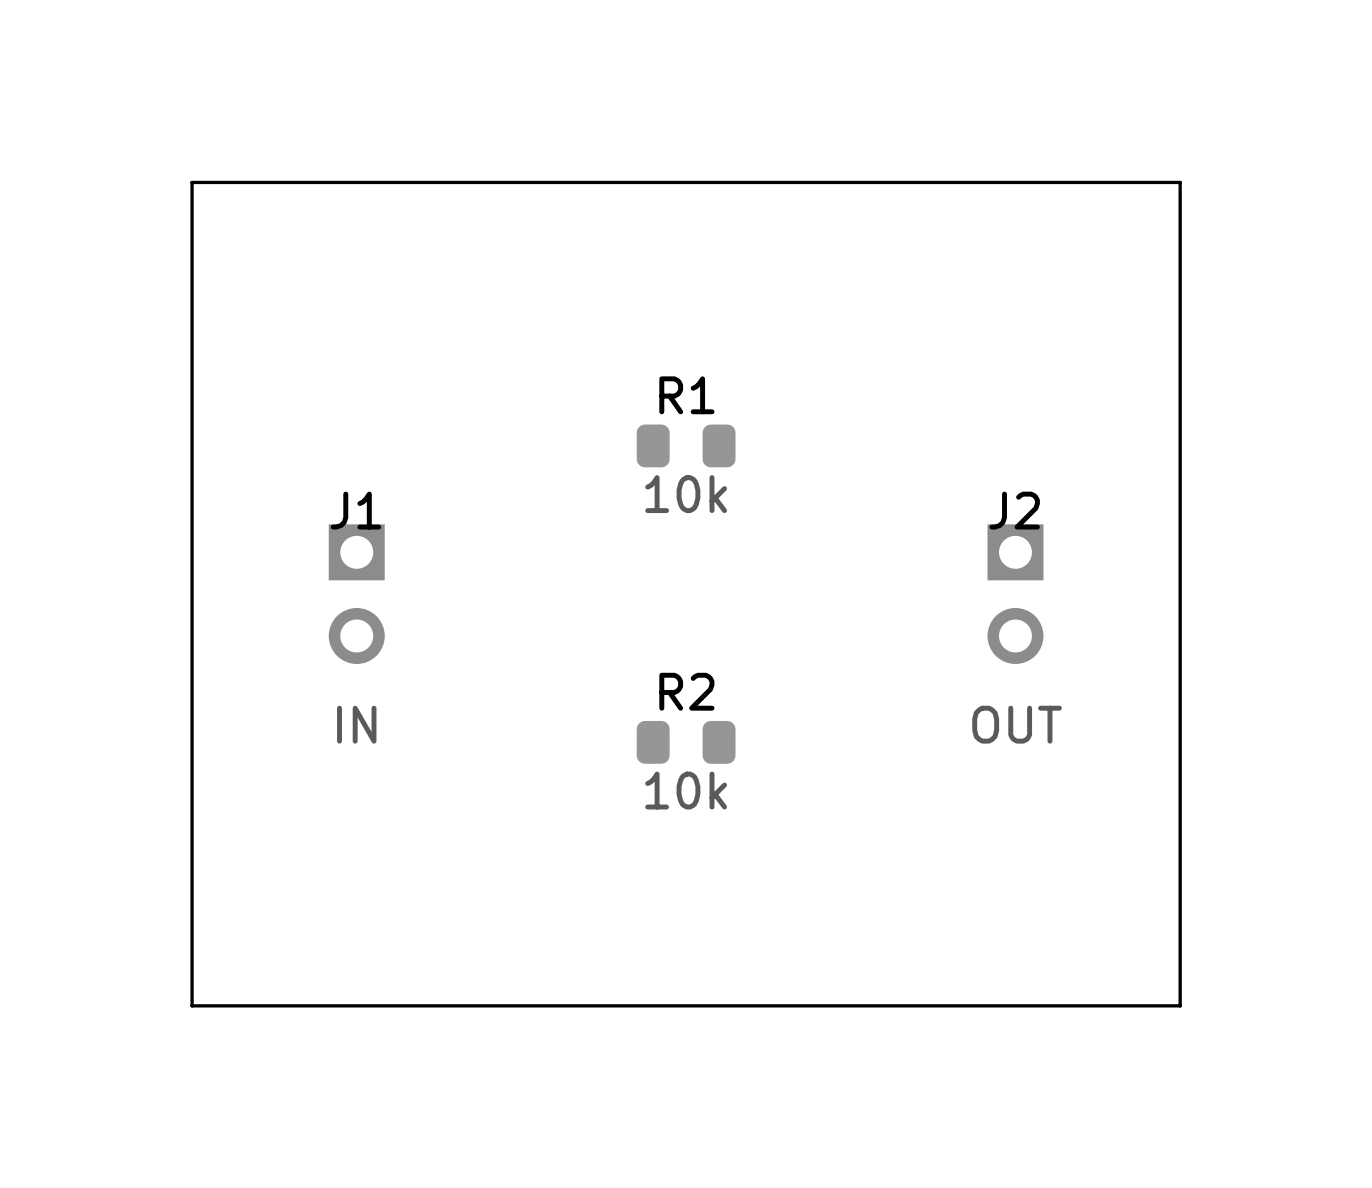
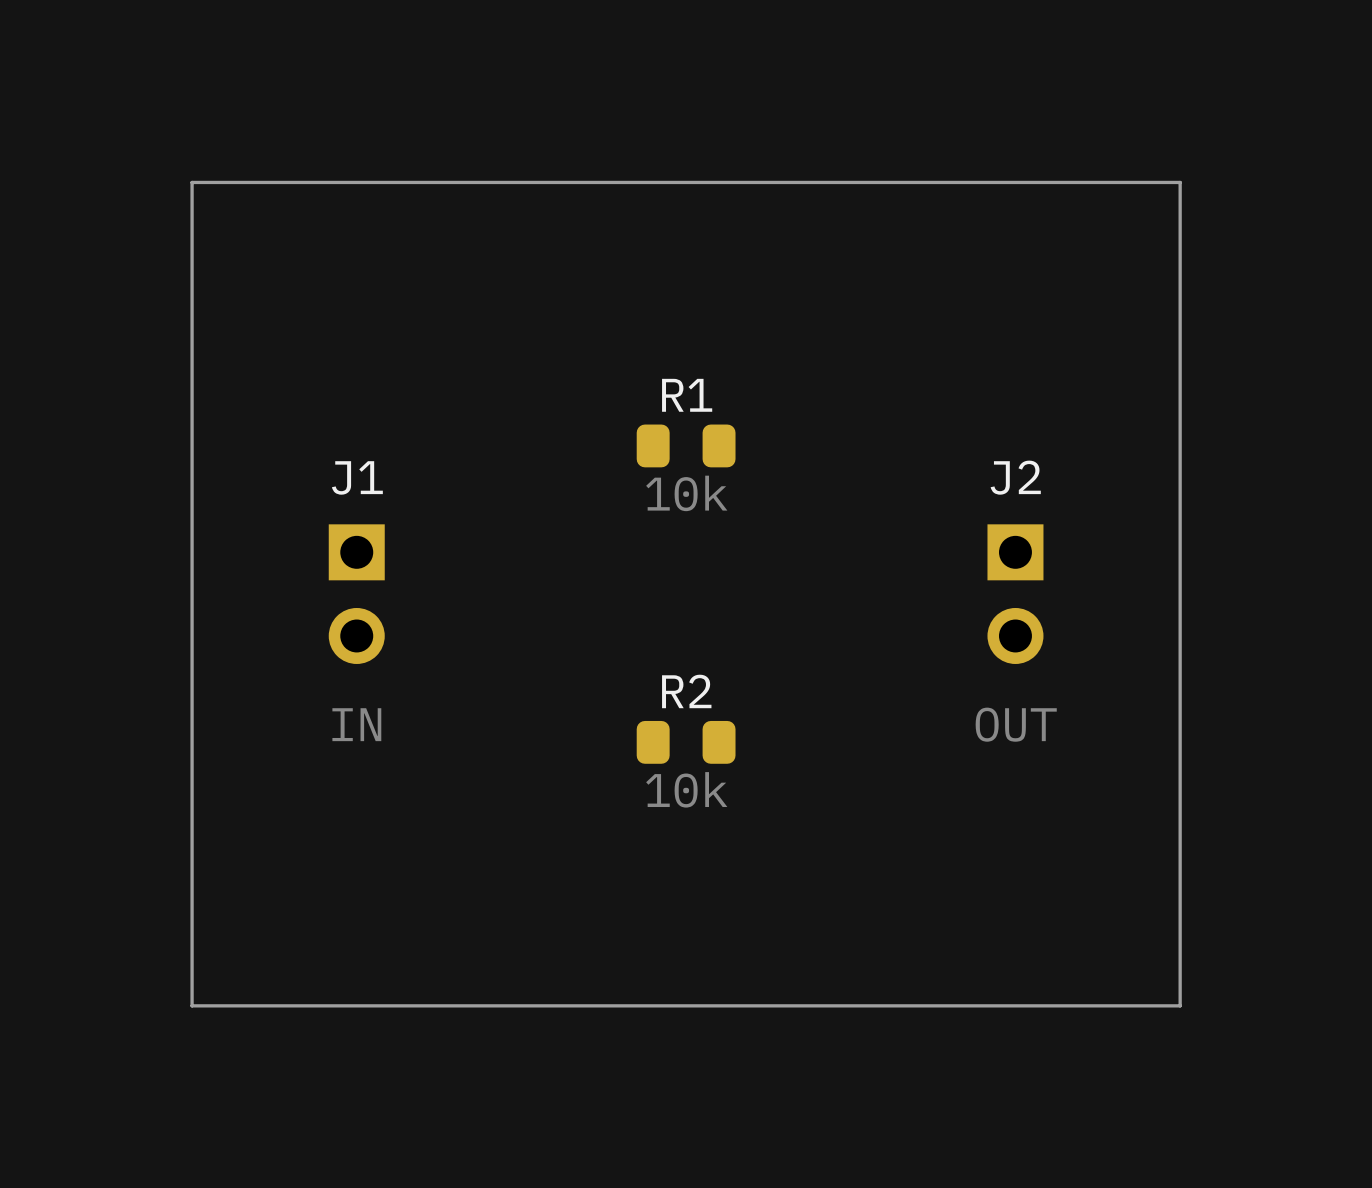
J1 name position: J1 (355, 510) -> J1 (357, 477)
J2 name position: J2 (1014, 510) -> J2 (1015, 477)

